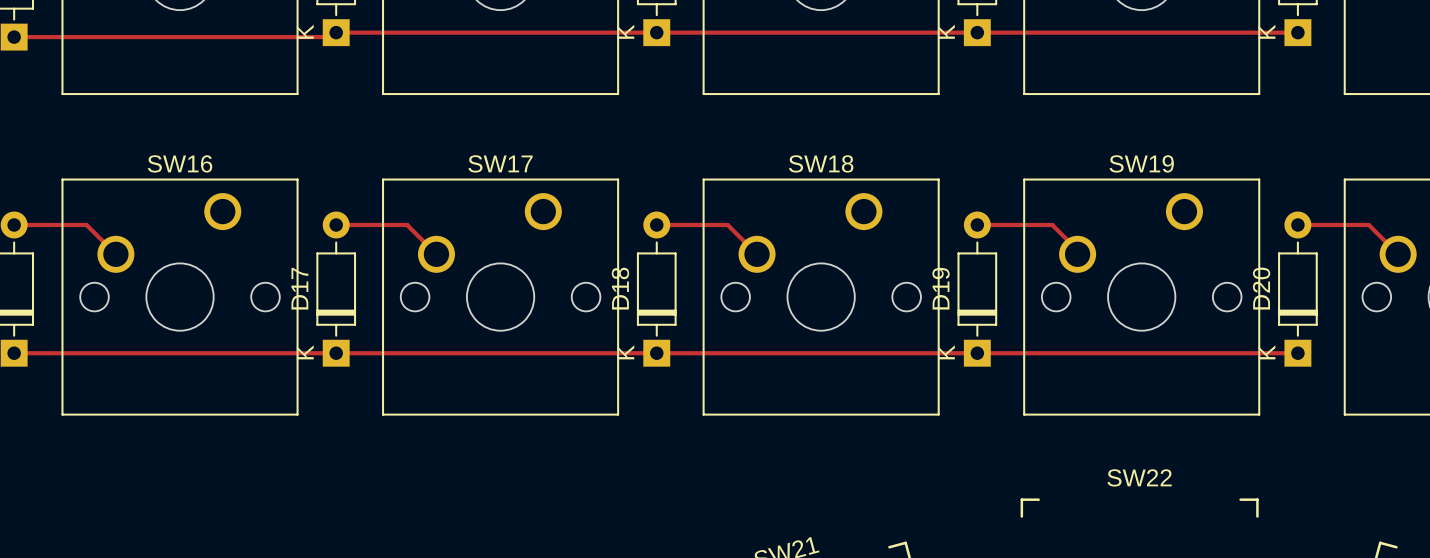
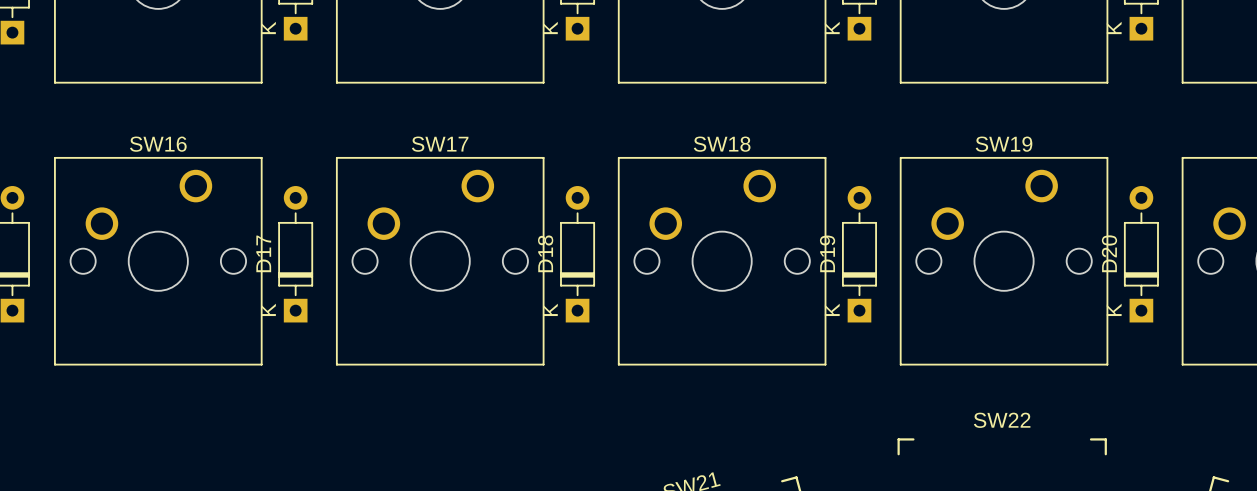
track: (1297, 32) (336, 32) (331, 37) (14, 37) -> none
track: (14, 224) (86, 224) (115, 254) -> none
track: (336, 224) (407, 224) (436, 254) -> none
track: (656, 224) (727, 224) (757, 254) -> none
track: (977, 224) (1052, 224) (1077, 250) (1077, 254) -> none
track: (1297, 224) (1368, 224) (1398, 254) -> none
track: (14, 353) (1297, 353) -> none

